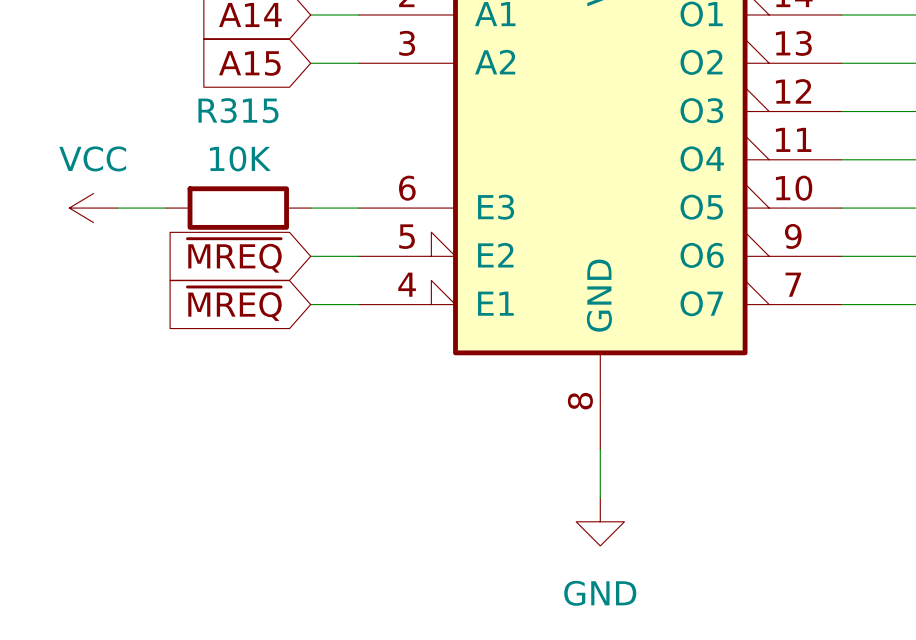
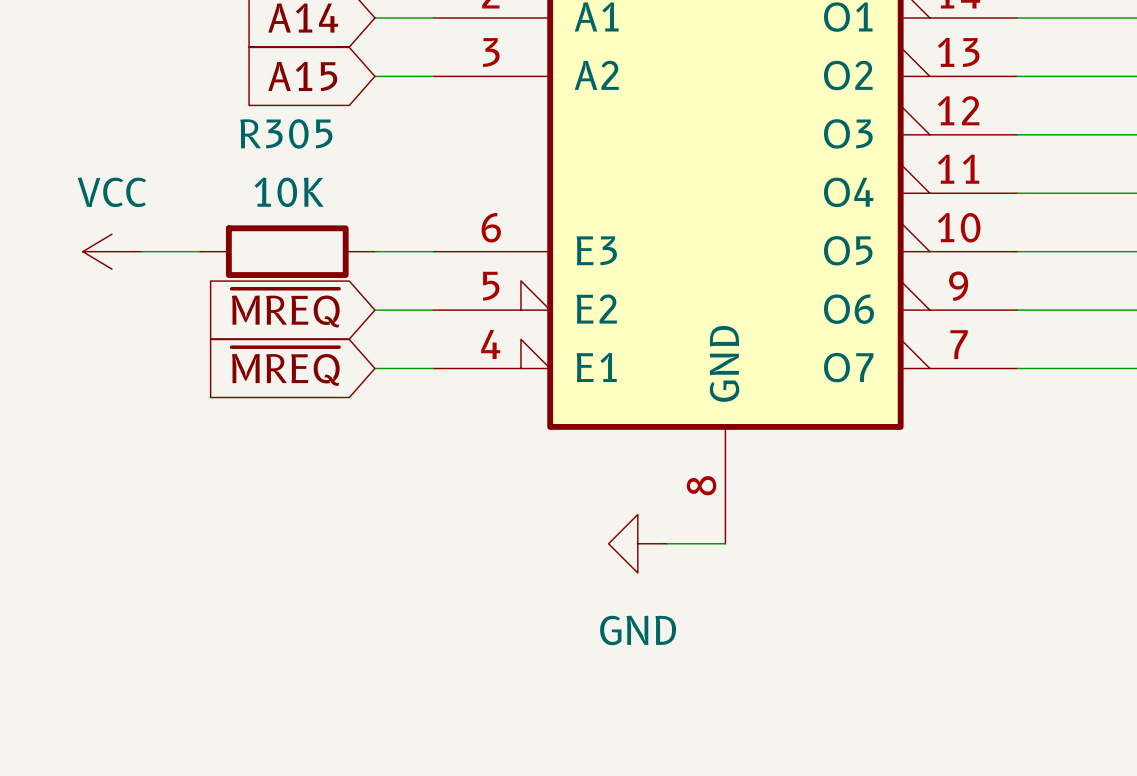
R315 name: R315 (238, 110) -> R305 (286, 133)
wire: (600, 449) (600, 497) -> (725, 543) (667, 543)
power symbol rotation: 0° (600, 521) -> 90° clockwise (637, 543)
power symbol position: GND (600, 521) -> GND (637, 543)

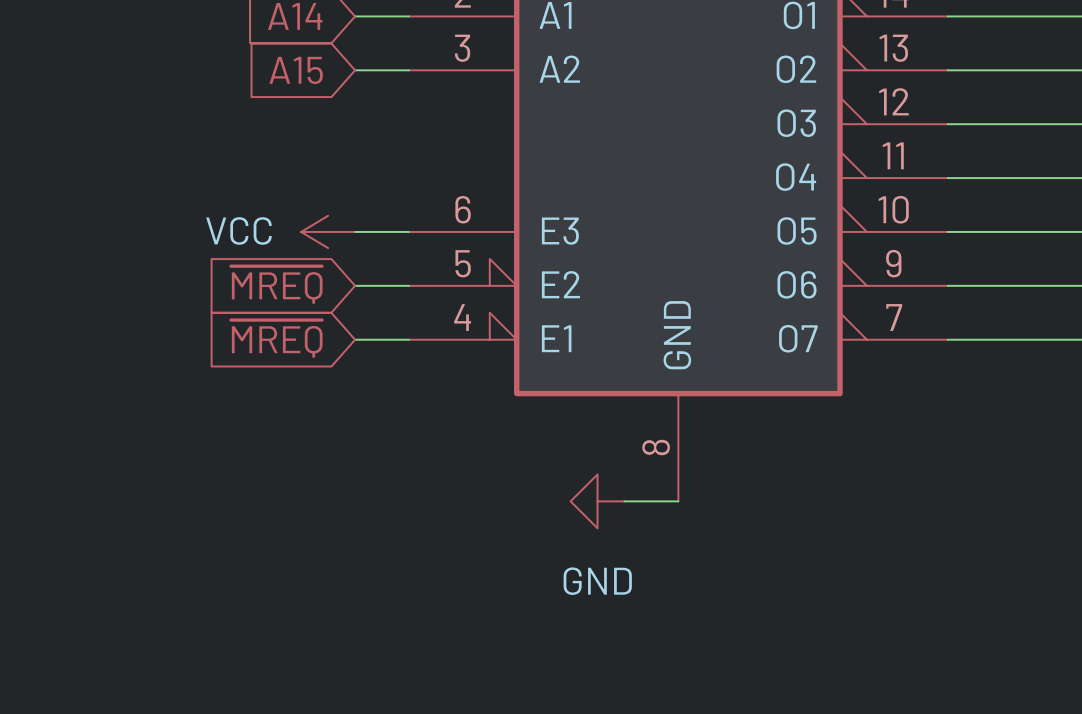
power symbol text position: VCC (111, 192) -> VCC (238, 230)
power symbol position: VCC (112, 251) -> VCC (328, 231)
wire: (141, 251) (199, 251) -> none
R305: 10K (287, 251) -> none

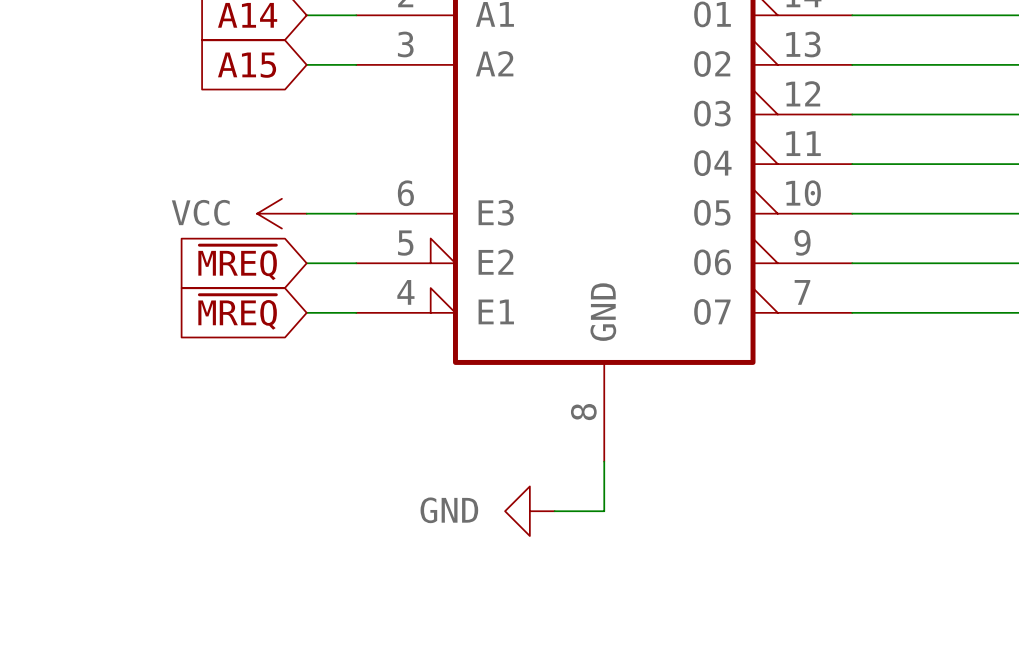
power symbol position: GND (597, 501) -> GND (529, 511)
wire: (624, 501) (678, 501) -> (554, 511) (604, 511) (604, 461)
power symbol text position: GND (597, 581) -> GND (449, 510)

